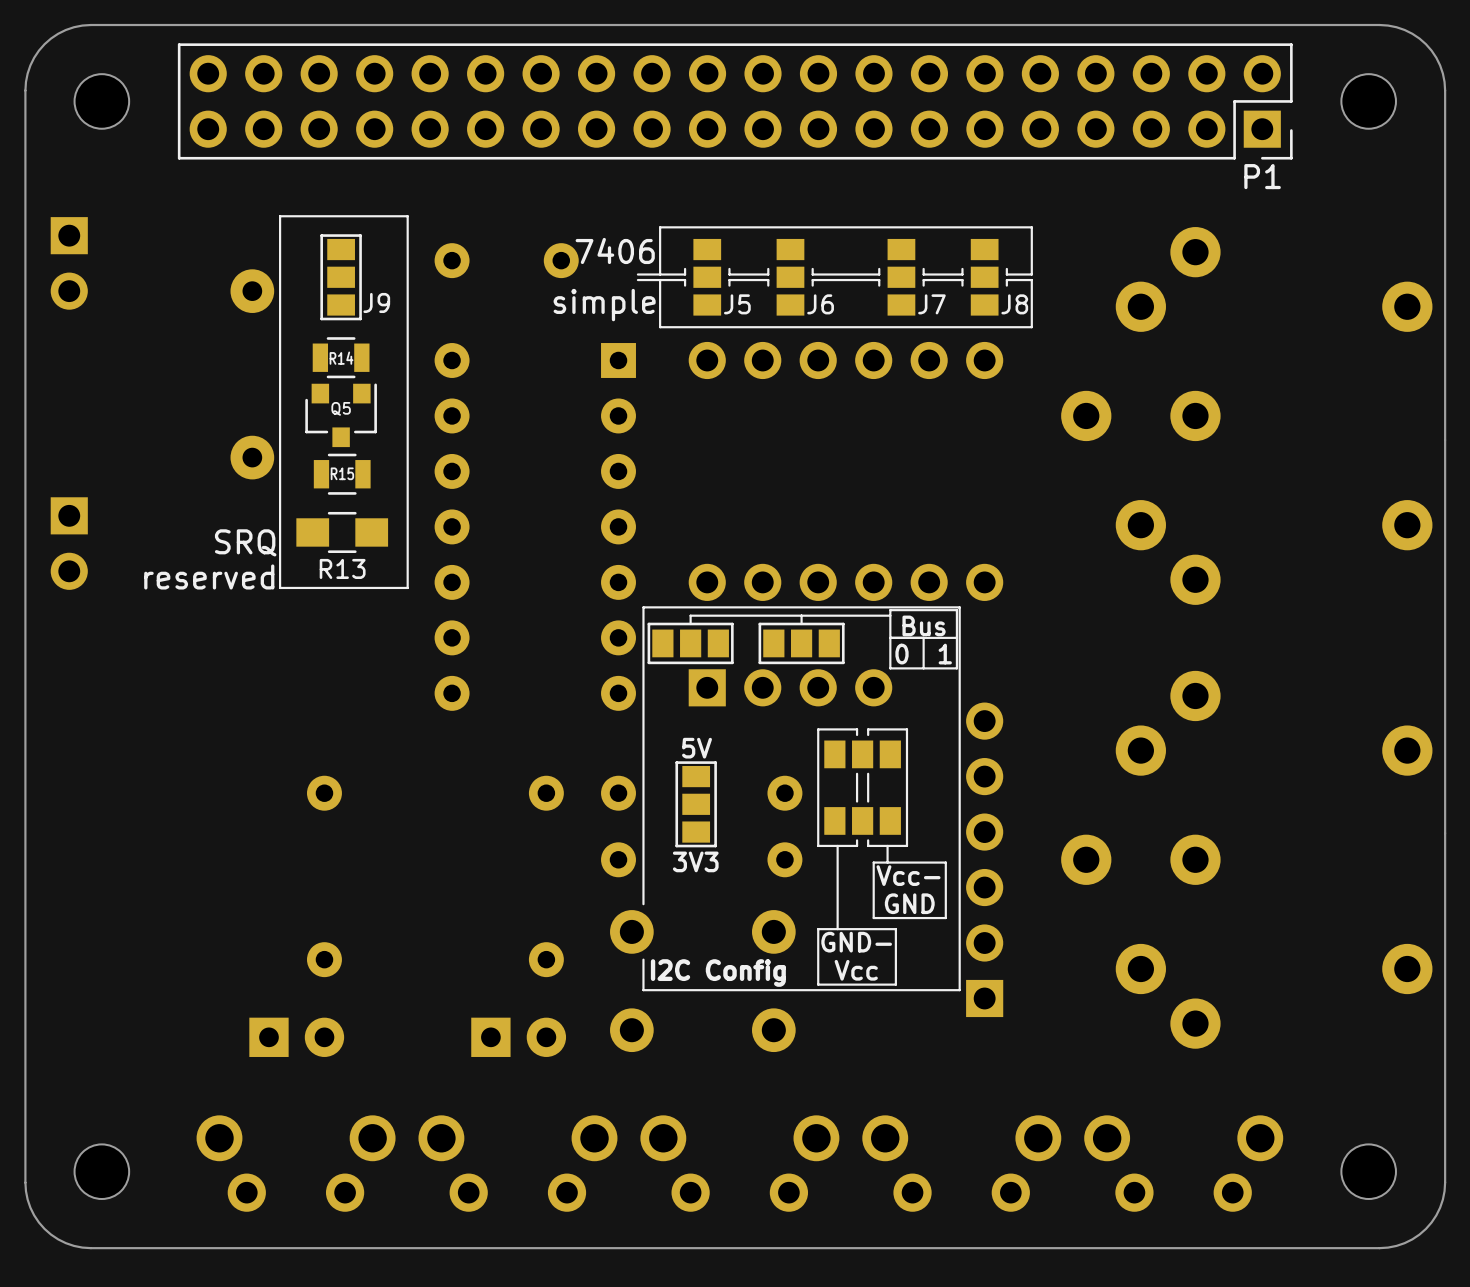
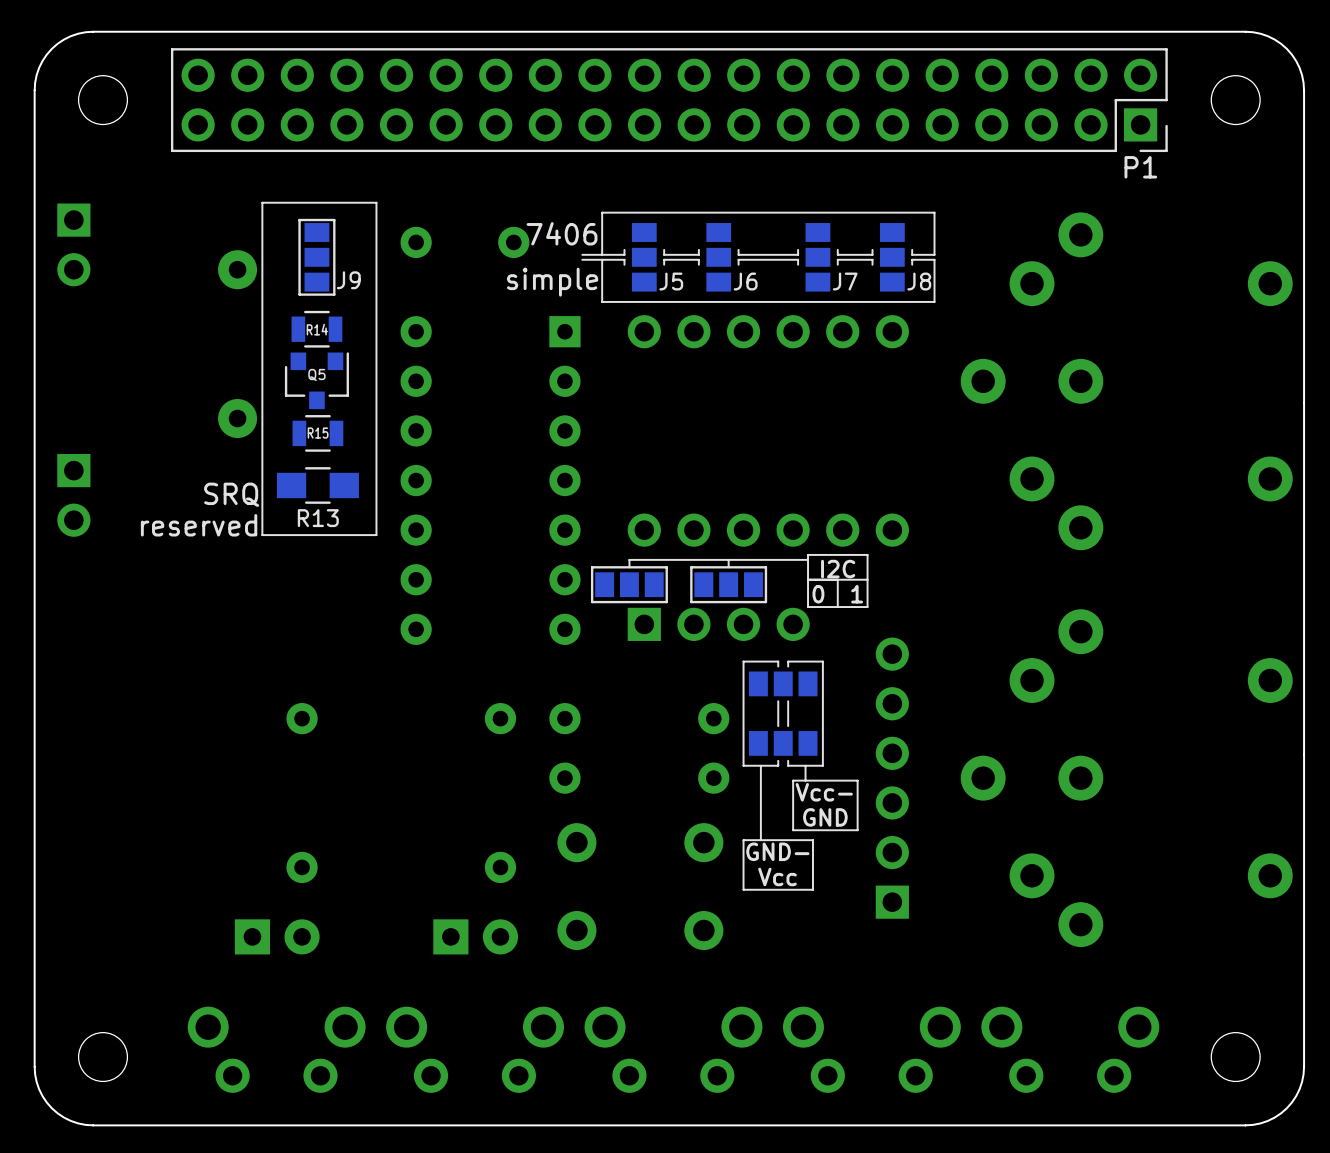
text: Bus (924, 625) -> I2C (838, 569)
text: 5V (697, 748) -> none
part: (696, 804) -> none
text: 3V3 (695, 861) -> none
line: (643, 904) (643, 607) (959, 607) (959, 990) (643, 990) (643, 959) -> none
text: I2C Config (718, 973) -> none

